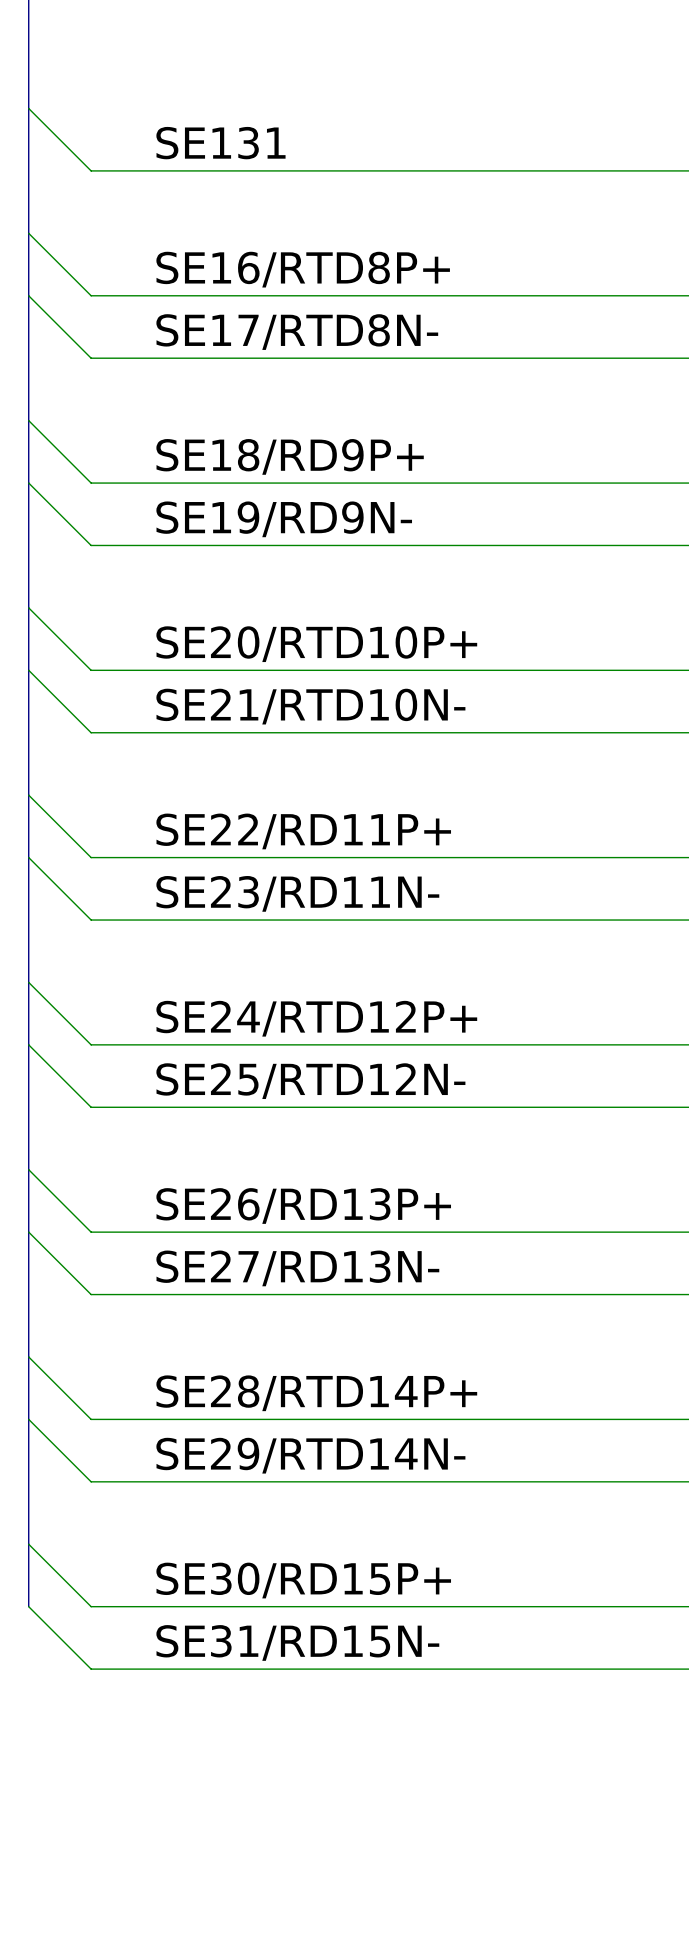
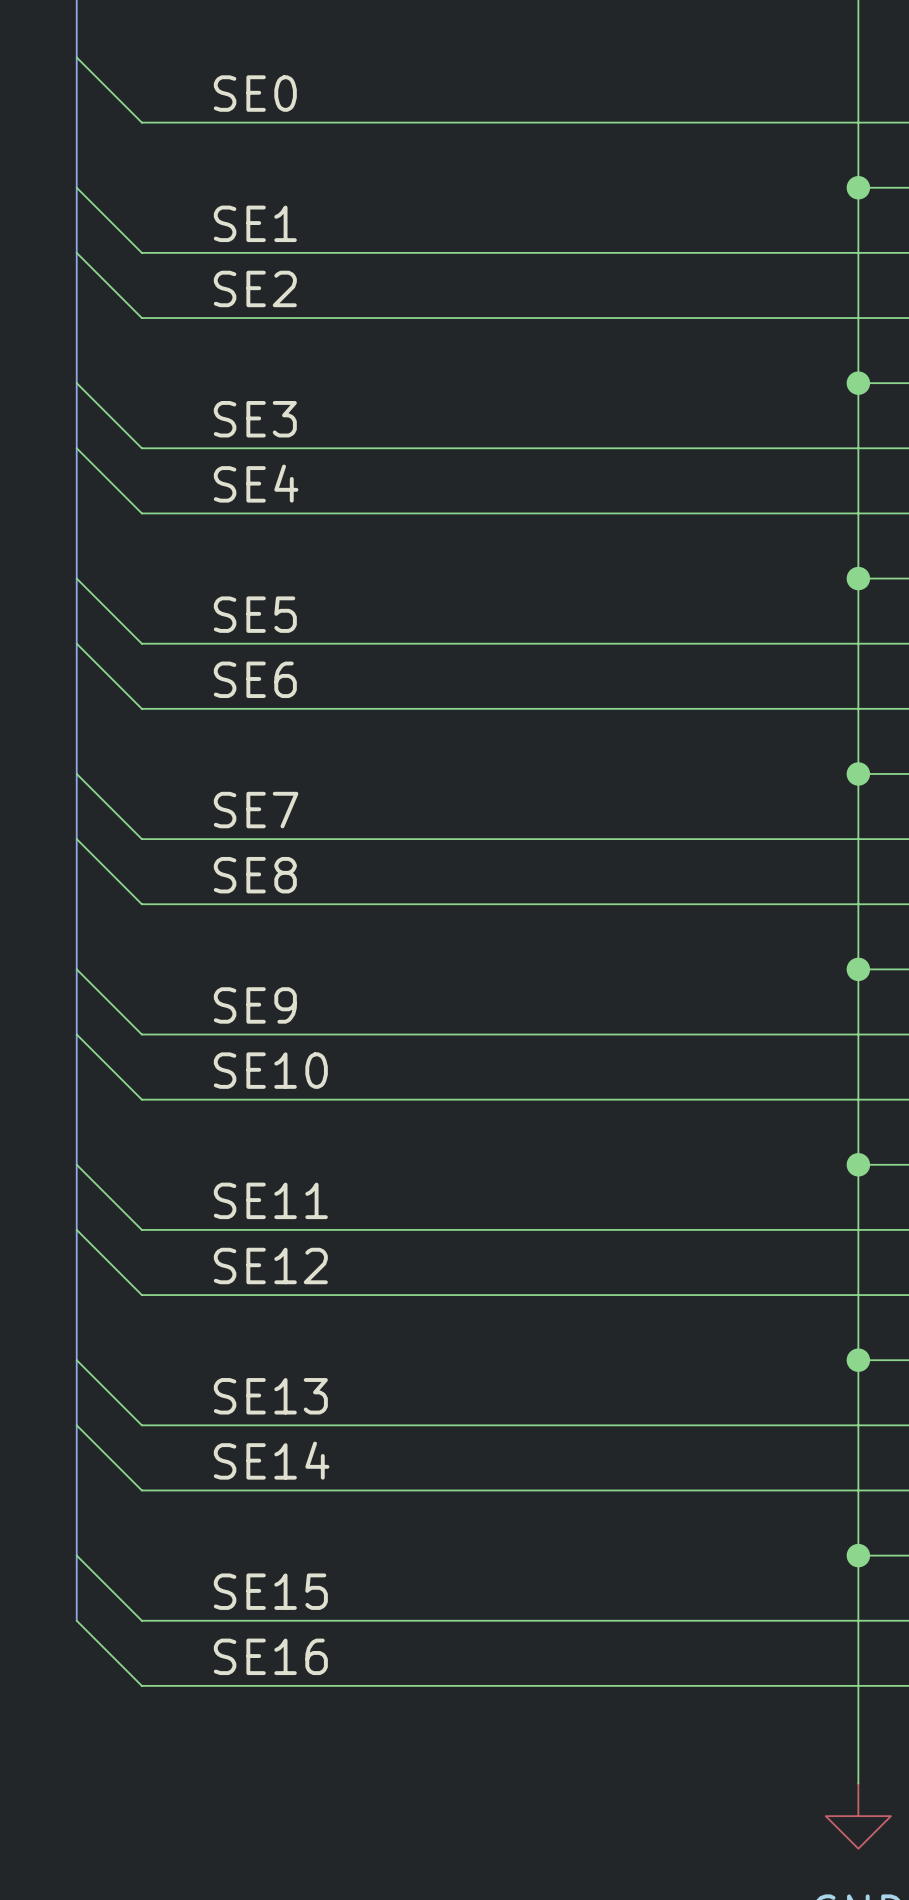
label: SE131 (220, 143) -> SE0 (255, 93)
label: SE16/RTD8P+ (303, 269) -> SE1 (255, 223)
label: SE17/RTD8N- (297, 332) -> SE2 (255, 288)
label: SE18/RD9P+ (290, 456) -> SE3 (255, 419)
label: SE19/RD9N- (284, 519) -> SE4 (256, 483)
label: SE20/RTD10P+ (316, 644) -> SE5 (255, 614)
label: SE21/RTD10N- (310, 706) -> SE6 (255, 679)
label: SE22/RD11P+ (303, 831) -> SE7 (256, 810)
label: SE23/RD11N- (297, 893) -> SE8 (255, 875)
label: SE24/RTD12P+ (316, 1018) -> SE9 (255, 1005)
label: SE25/RTD12N- (310, 1081) -> SE10 (270, 1070)
label: SE26/RD13P+ (303, 1205) -> SE11 (270, 1200)
label: SE27/RD13N- (297, 1268) -> SE12 (270, 1266)
label: SE28/RTD14P+ (316, 1393) -> SE13 (270, 1396)
label: SE29/RTD14N- (310, 1455) -> SE14 (271, 1460)
label: SE30/RD15P+ (303, 1580) -> SE15 (270, 1591)
label: SE31/RD15N- (297, 1642) -> SE16 (270, 1656)

